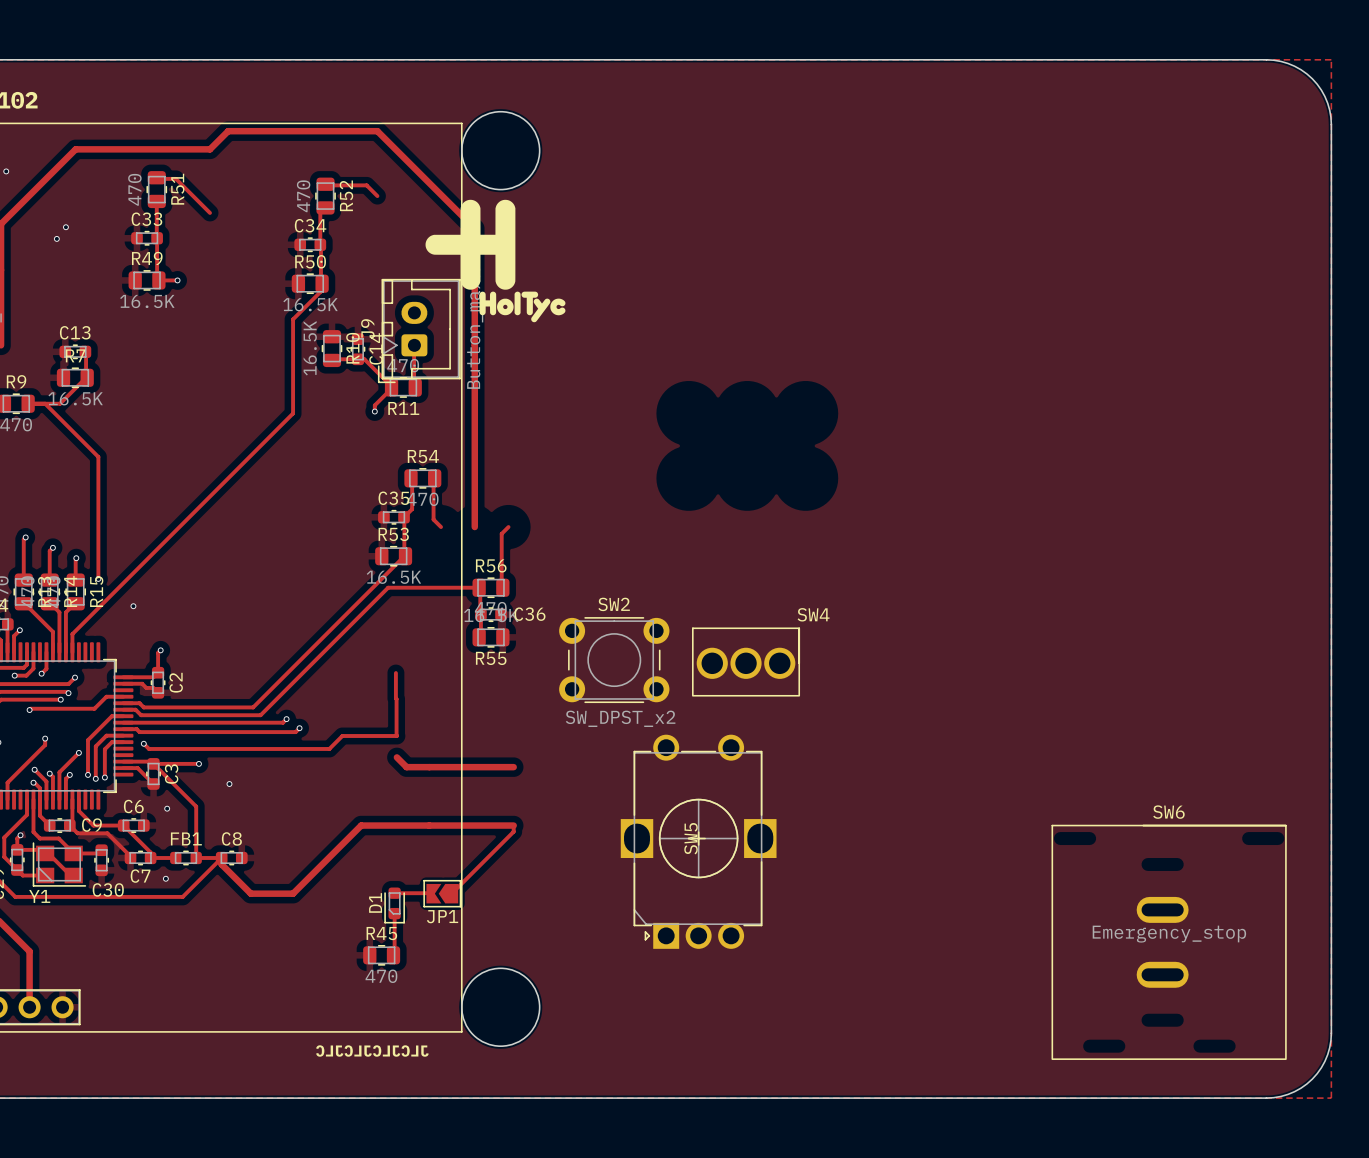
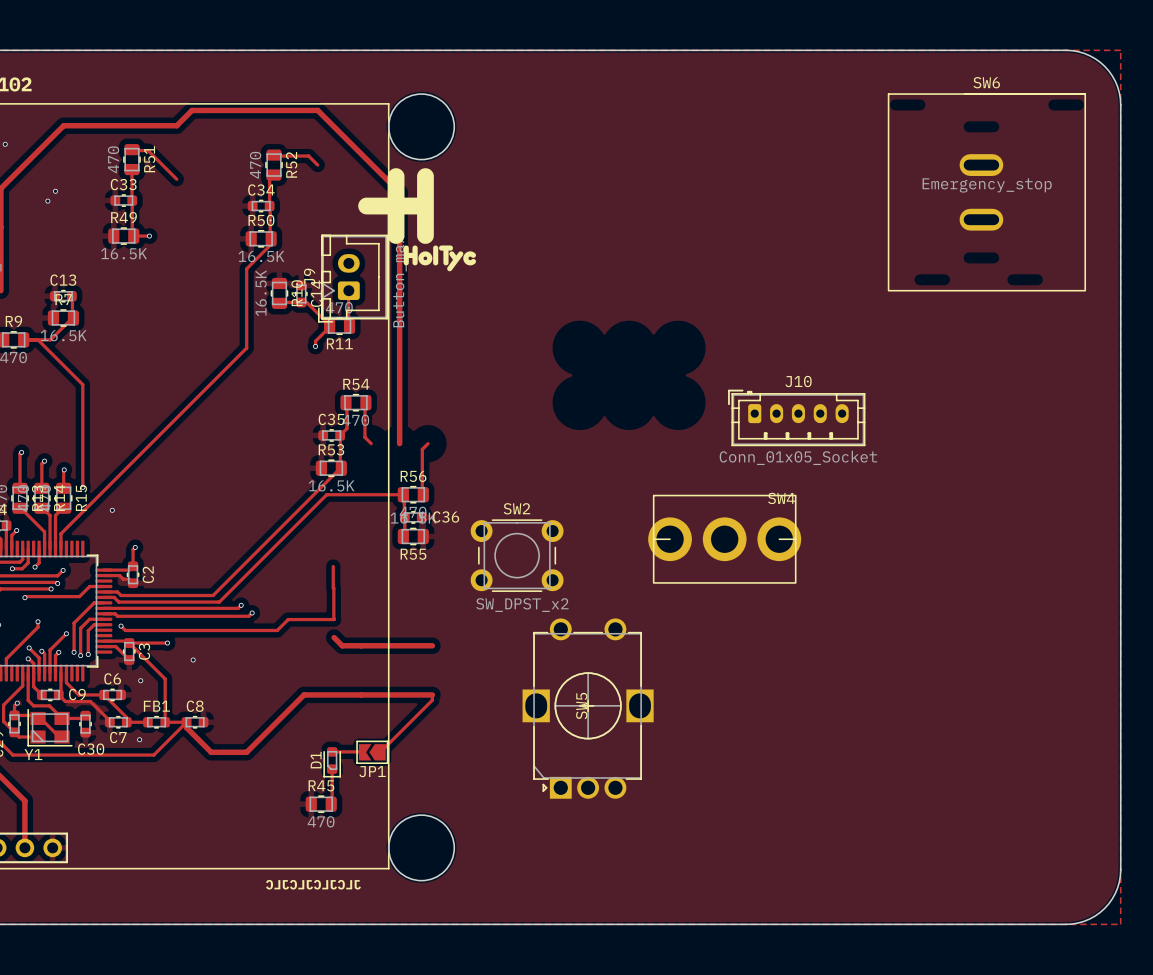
J10: none -> Conn_01x05_Socket (796, 417)
SW4 footprint: [692, 627, 800, 697] -> [648, 495, 802, 584]
SW6 position: (1169, 942) -> (986, 192)

